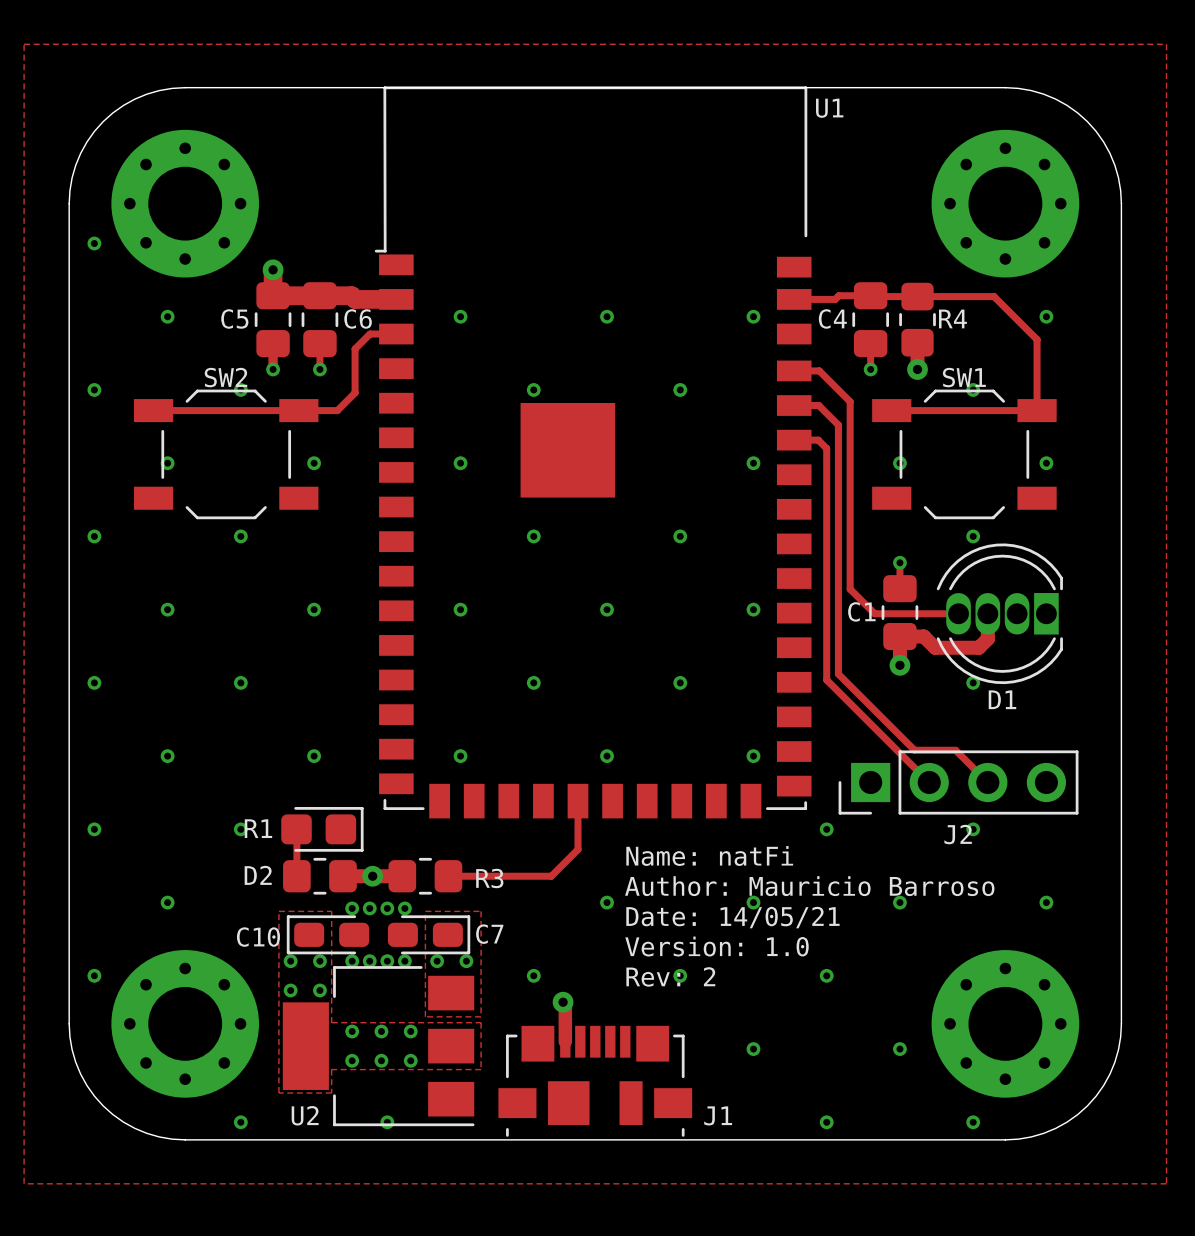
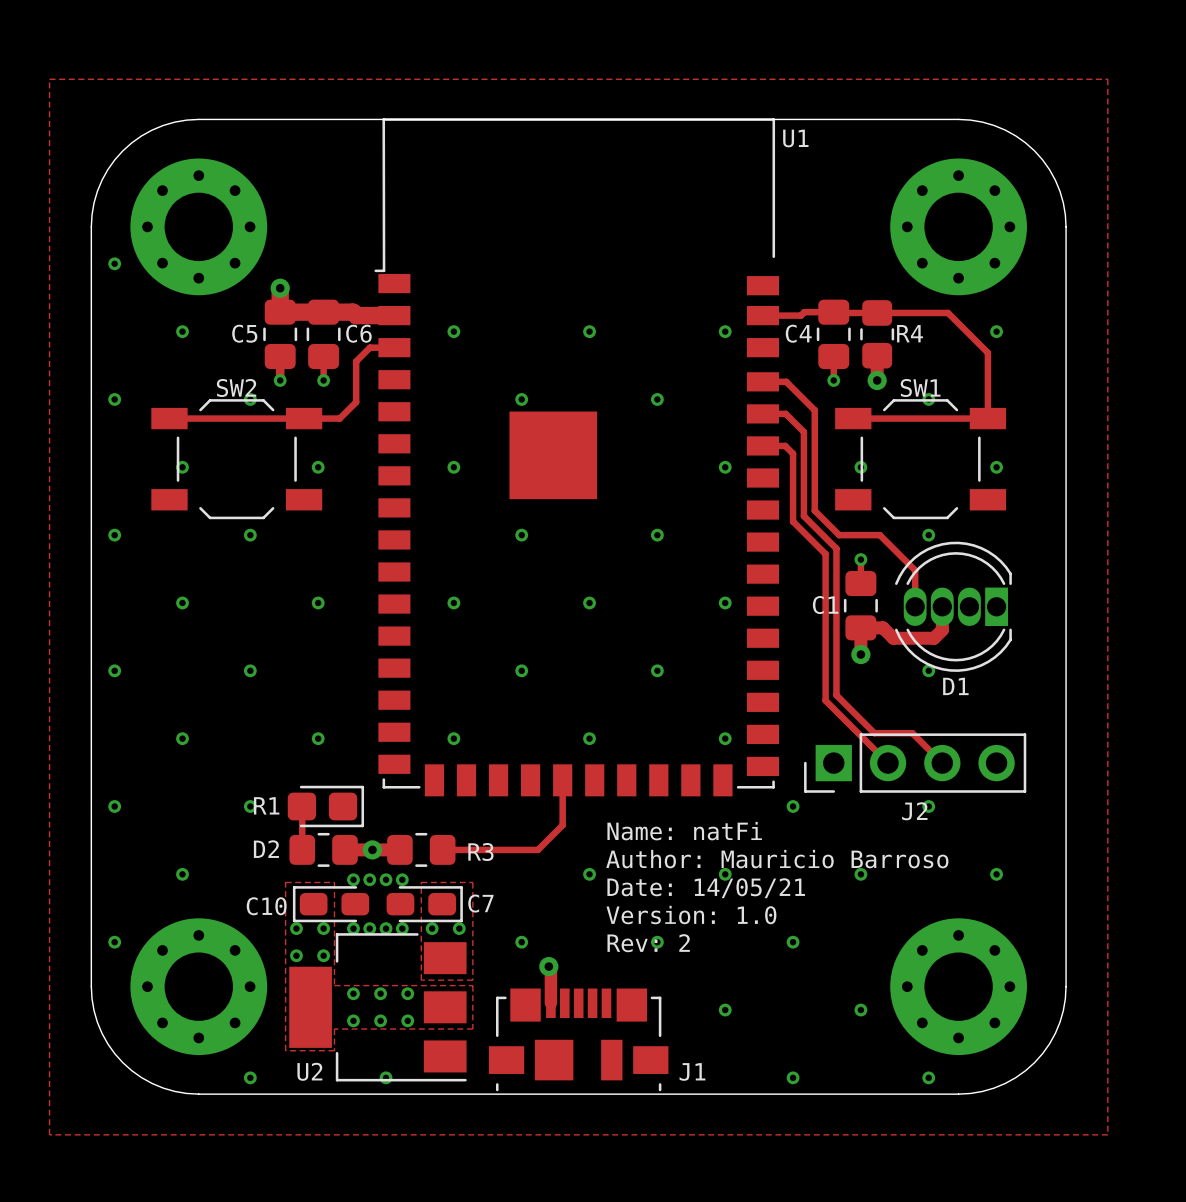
track: (850, 510) (850, 589) (874, 613) (958, 613) -> (814, 510) (839, 535) (879, 535) (915, 570) (915, 606)
track: (838, 515) (838, 674) (873, 709) -> (803, 516) (836, 548) (836, 695)
track: (826, 521) (826, 679) (861, 715) -> (793, 521) (825, 554) (825, 700)

